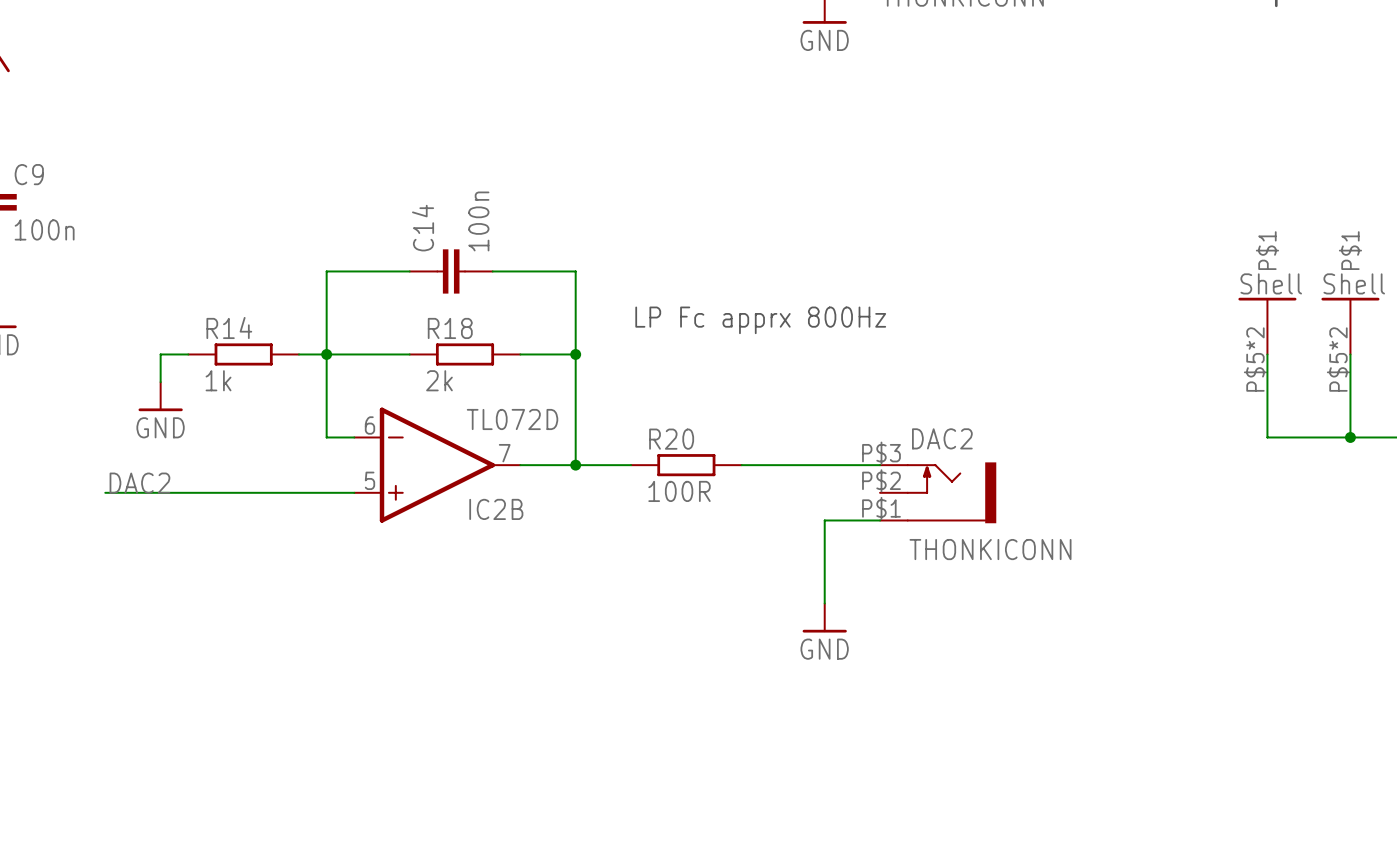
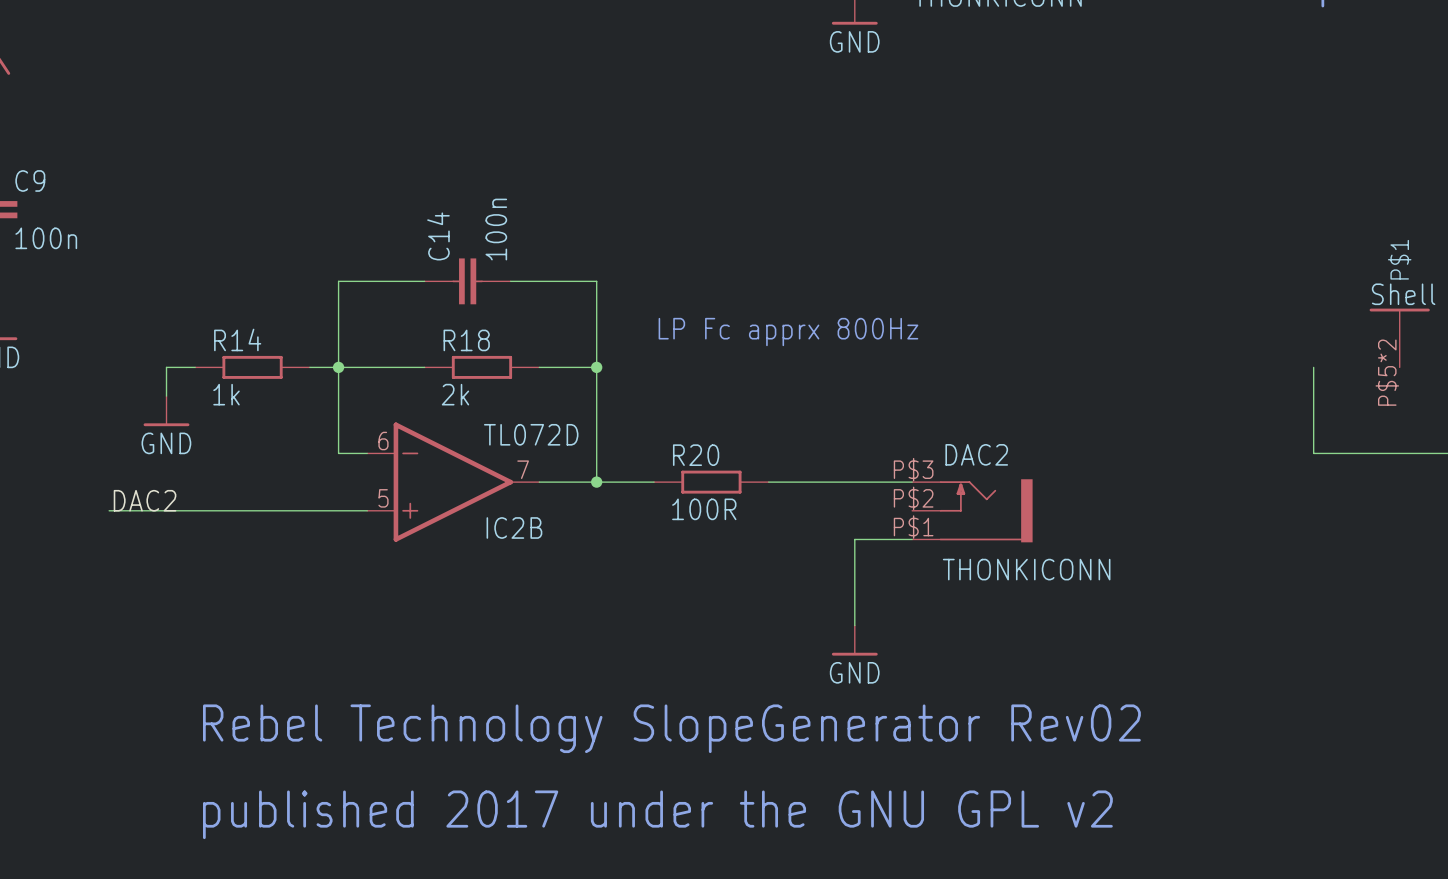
part: (1267, 326) -> none
wire: (1350, 354) (1350, 437) -> none
junction: (1350, 437) -> none
text: none -> Rebel Technology SlopeGenerator Rev02 (671, 728)
text: none -> published 2017 under the GNU GPL v2 (657, 814)

